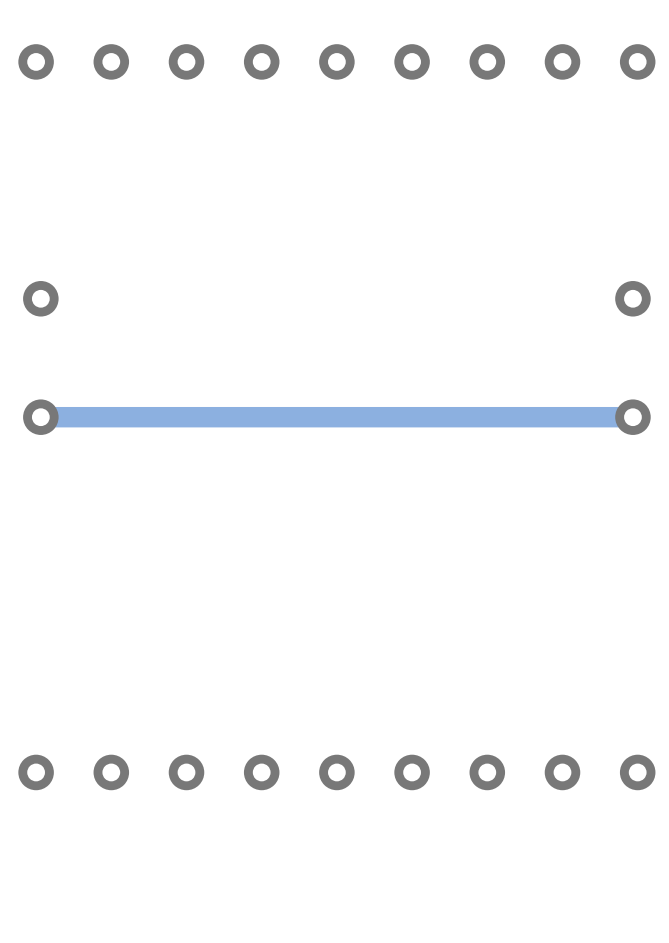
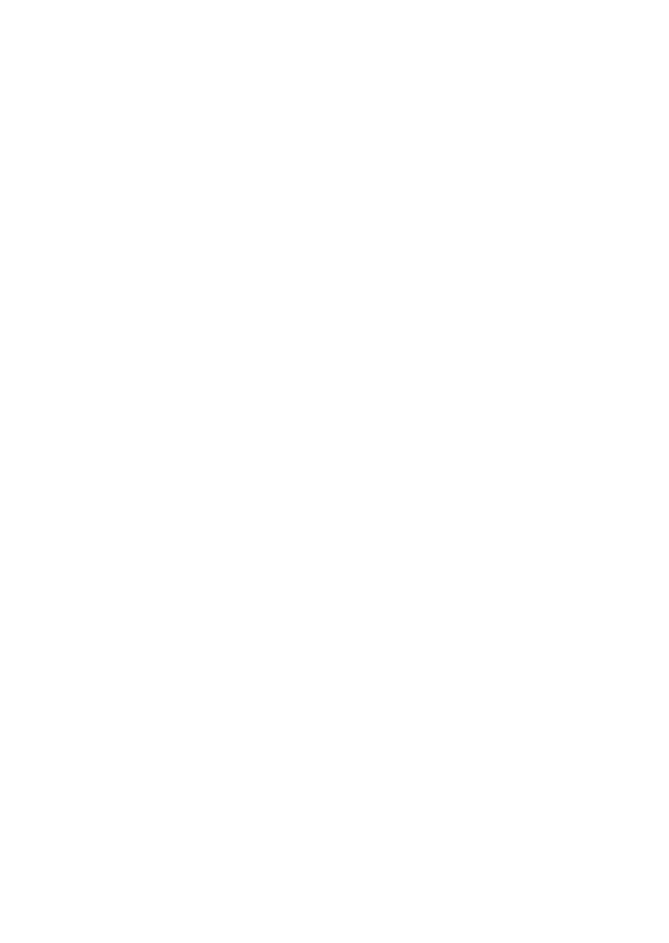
via: (36, 61) -> none
via: (111, 61) -> none
via: (186, 61) -> none
via: (261, 61) -> none
via: (336, 61) -> none
via: (412, 61) -> none
via: (487, 61) -> none
via: (562, 61) -> none
via: (637, 61) -> none
via: (40, 298) -> none
via: (632, 298) -> none
via: (40, 417) -> none
track: (632, 417) (40, 417) -> none
via: (632, 417) -> none
via: (36, 772) -> none
via: (111, 772) -> none
via: (186, 772) -> none
via: (261, 772) -> none
via: (336, 772) -> none
via: (412, 772) -> none
via: (487, 772) -> none
via: (562, 772) -> none
via: (637, 772) -> none

